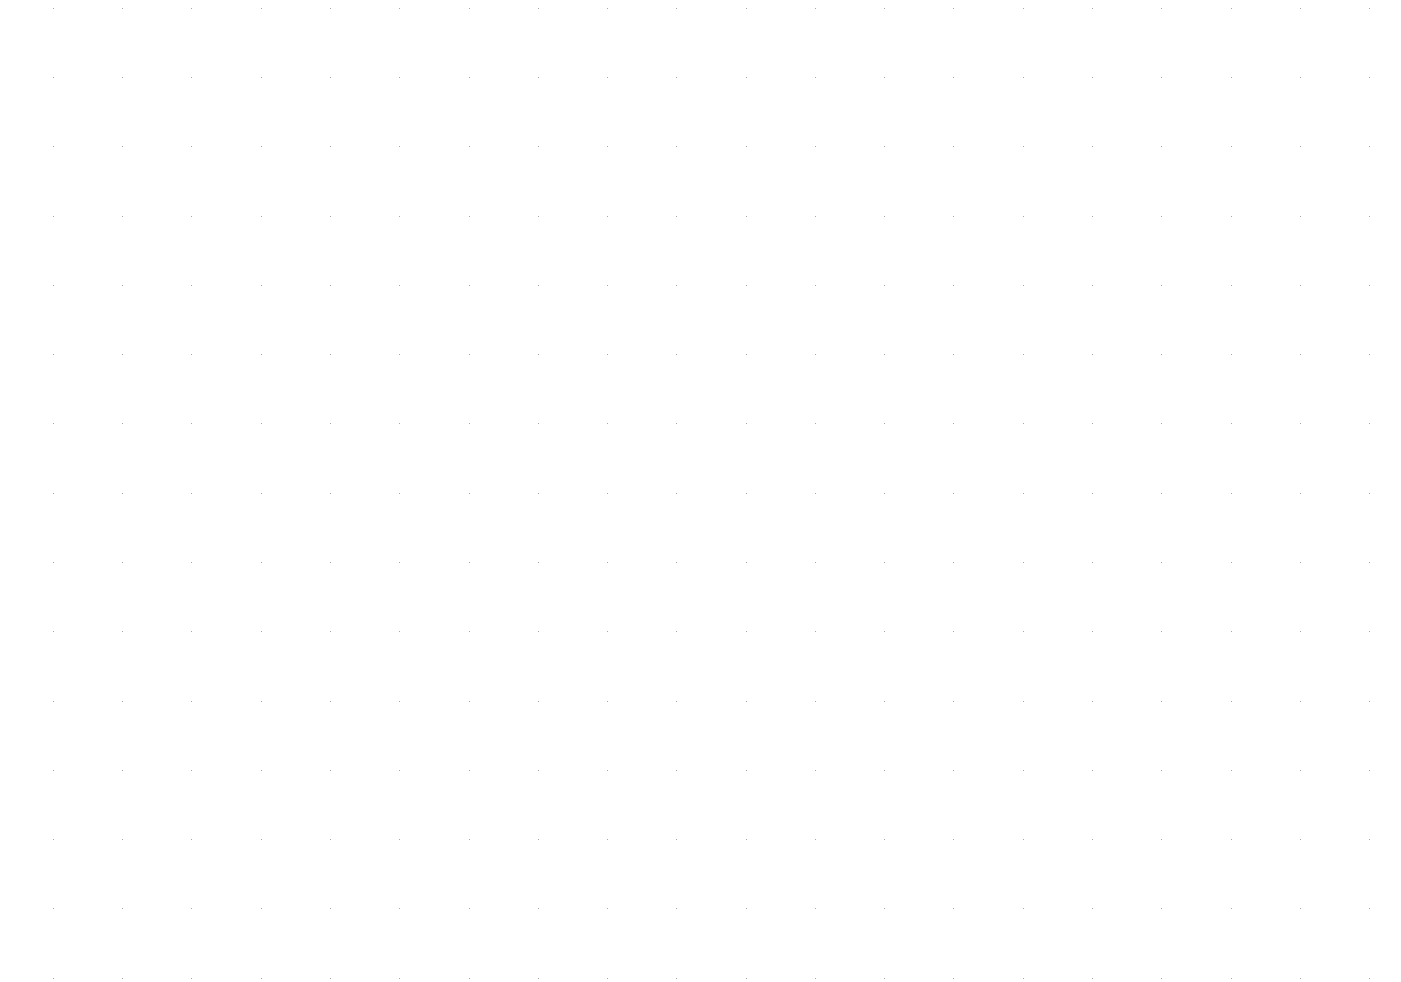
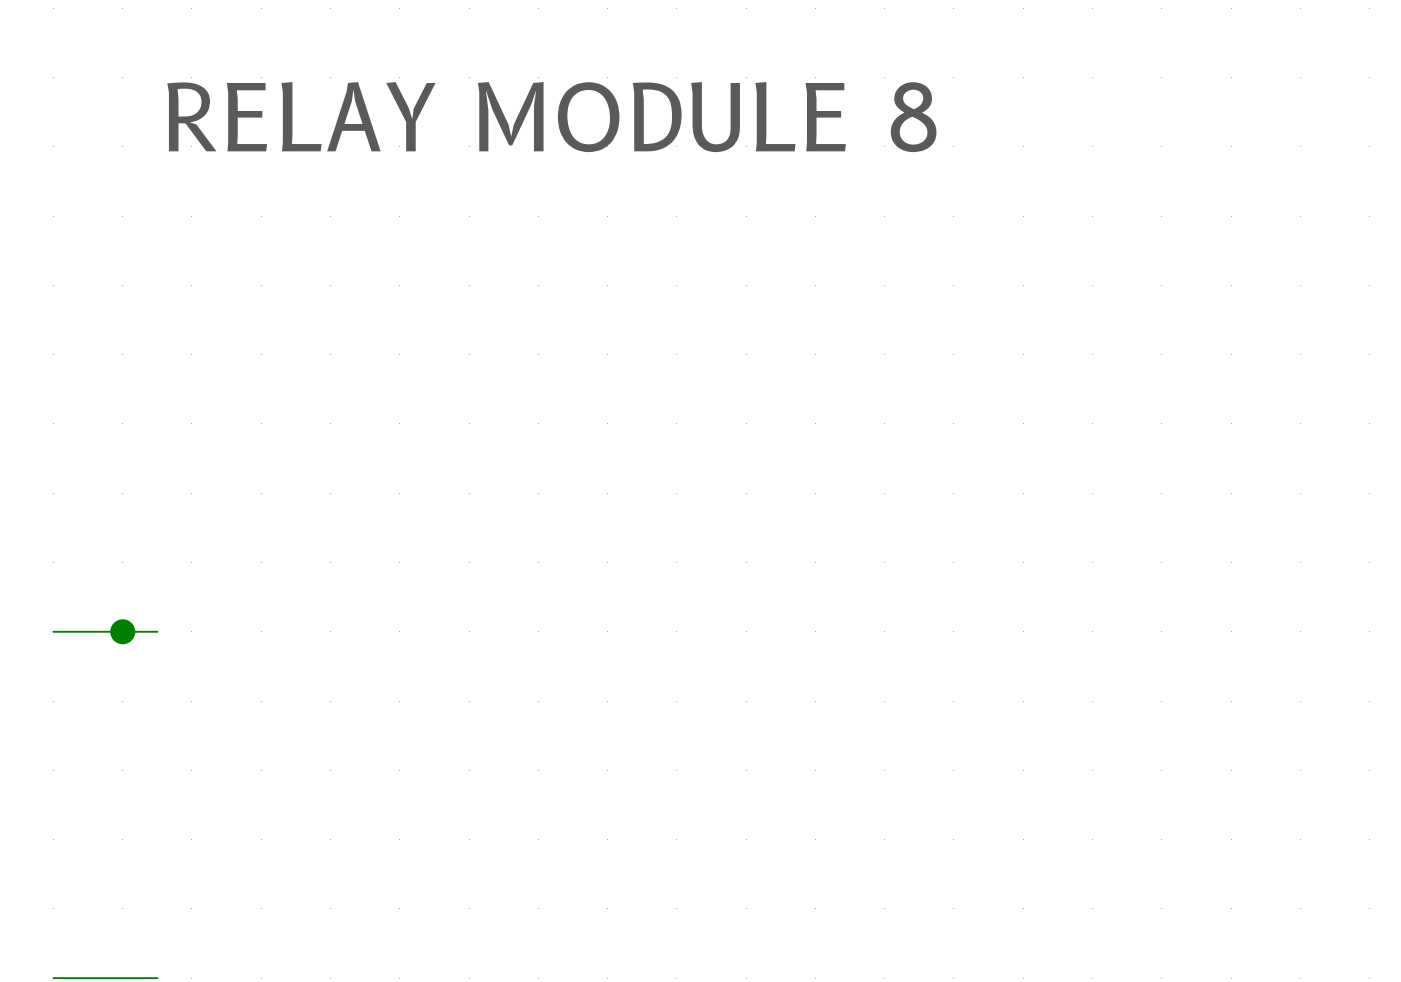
text: none -> RELAY MODULE 8 (551, 117)
wire: none -> (53, 631) (157, 631)
junction: none -> (122, 631)
wire: none -> (53, 978) (157, 978)

